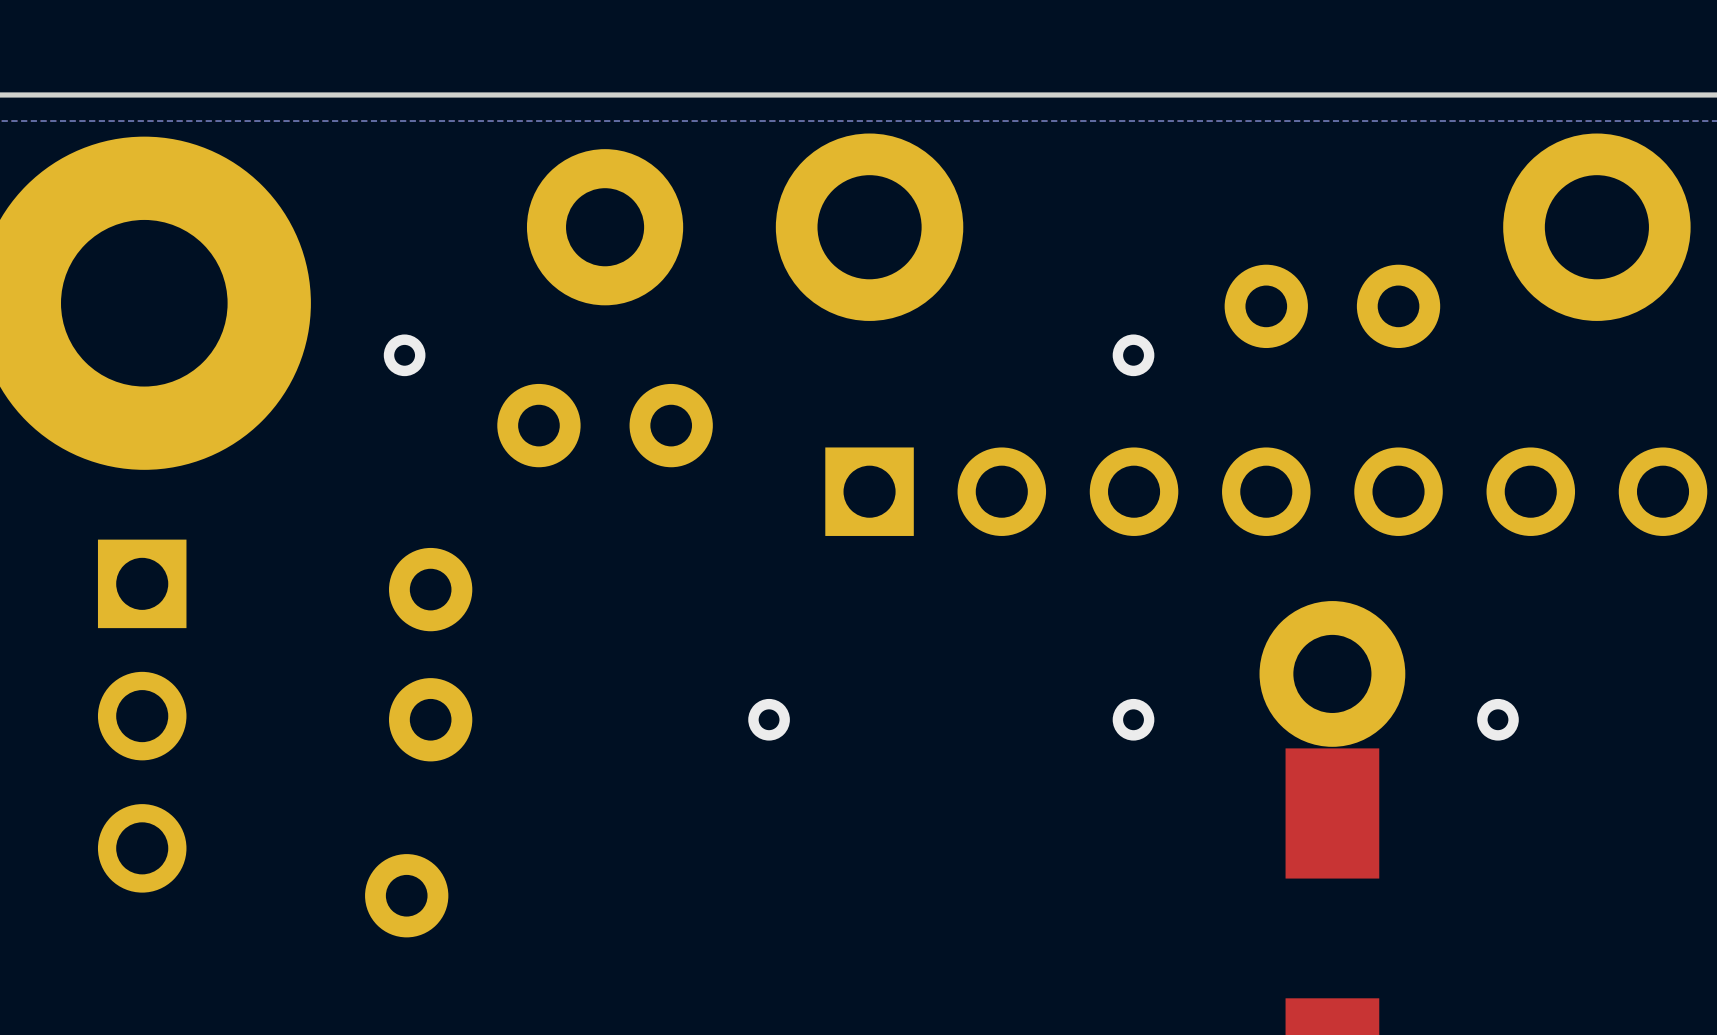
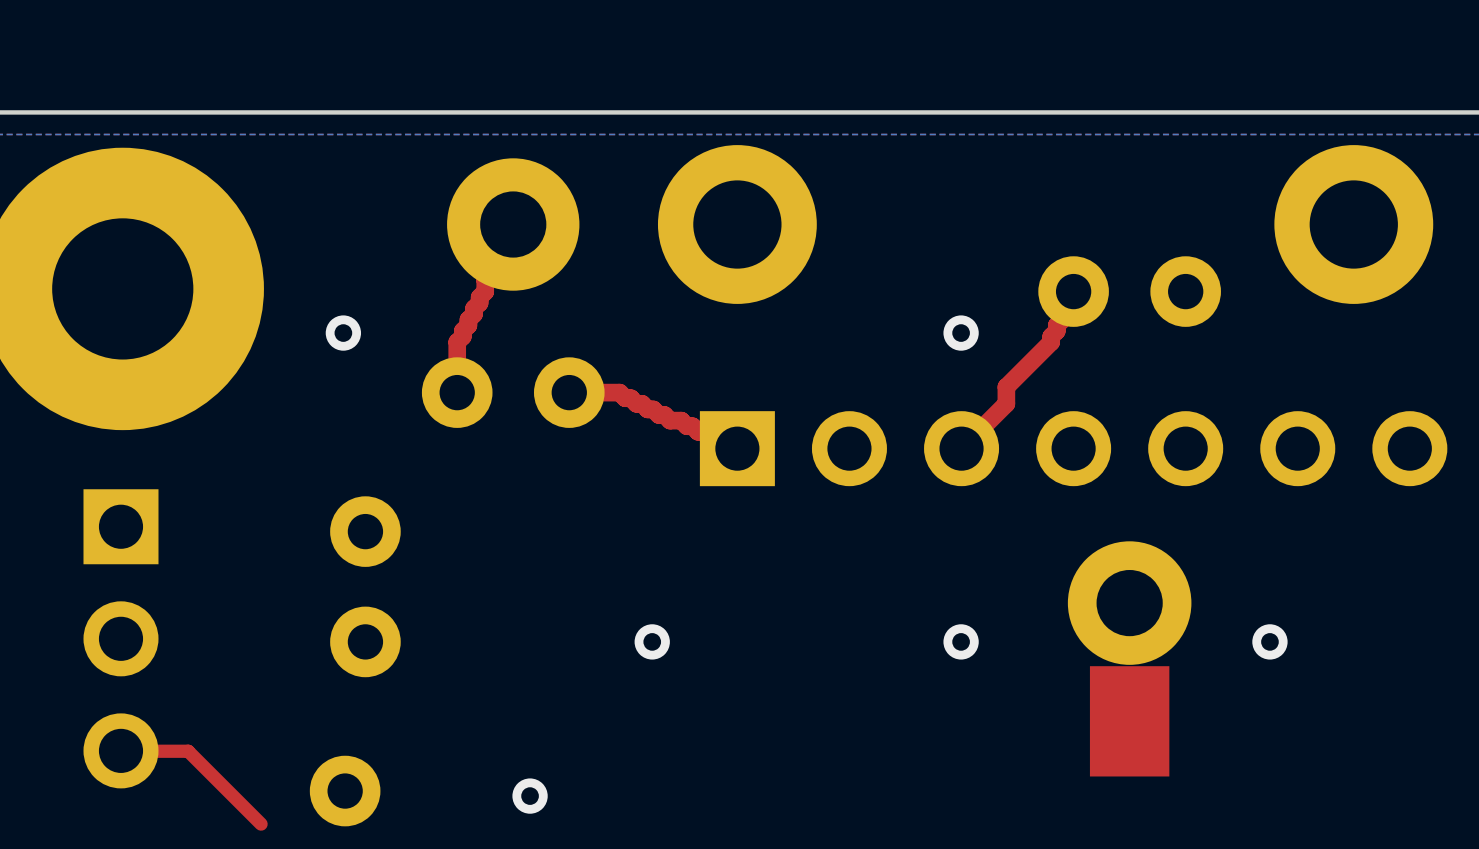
top track: none -> (513, 224) (513, 230) (507, 235) (507, 241) (502, 246) (502, 252) (496, 258) (496, 263) (490, 269) (490, 274) (485, 280) (485, 291) (479, 297) (479, 302) (474, 308) (474, 314) (468, 319) (468, 325) (462, 330) (462, 336) (457, 342) (457, 392)
top track: none -> (1073, 291) (1073, 297) (1068, 302) (1068, 308) (1062, 314) (1062, 319) (1056, 325) (1056, 330) (1051, 336) (1051, 342) (1006, 387) (1006, 403) (961, 448)
top track: none -> (569, 392) (619, 392) (625, 398) (630, 398) (636, 403) (642, 403) (647, 409) (653, 409) (658, 415) (664, 415) (670, 420) (681, 420) (686, 426) (692, 426) (698, 431) (703, 431) (709, 437) (714, 437) (720, 443) (726, 443) (731, 448) (737, 448)
top track: none -> (120, 751) (188, 751) (261, 824)
via: none -> (530, 796)

